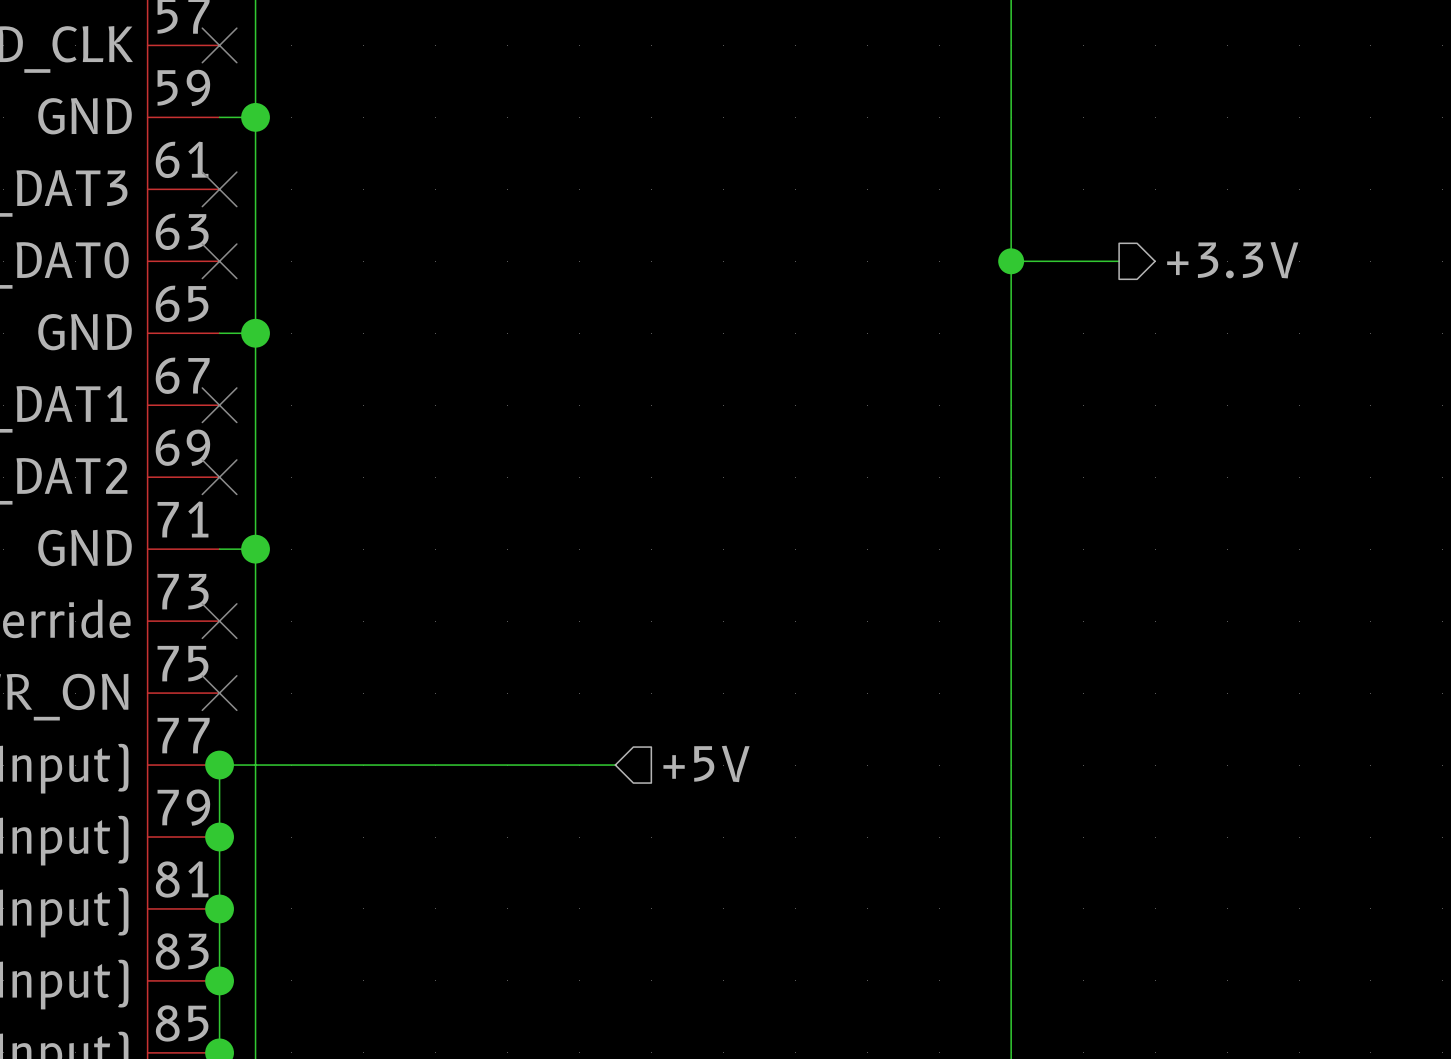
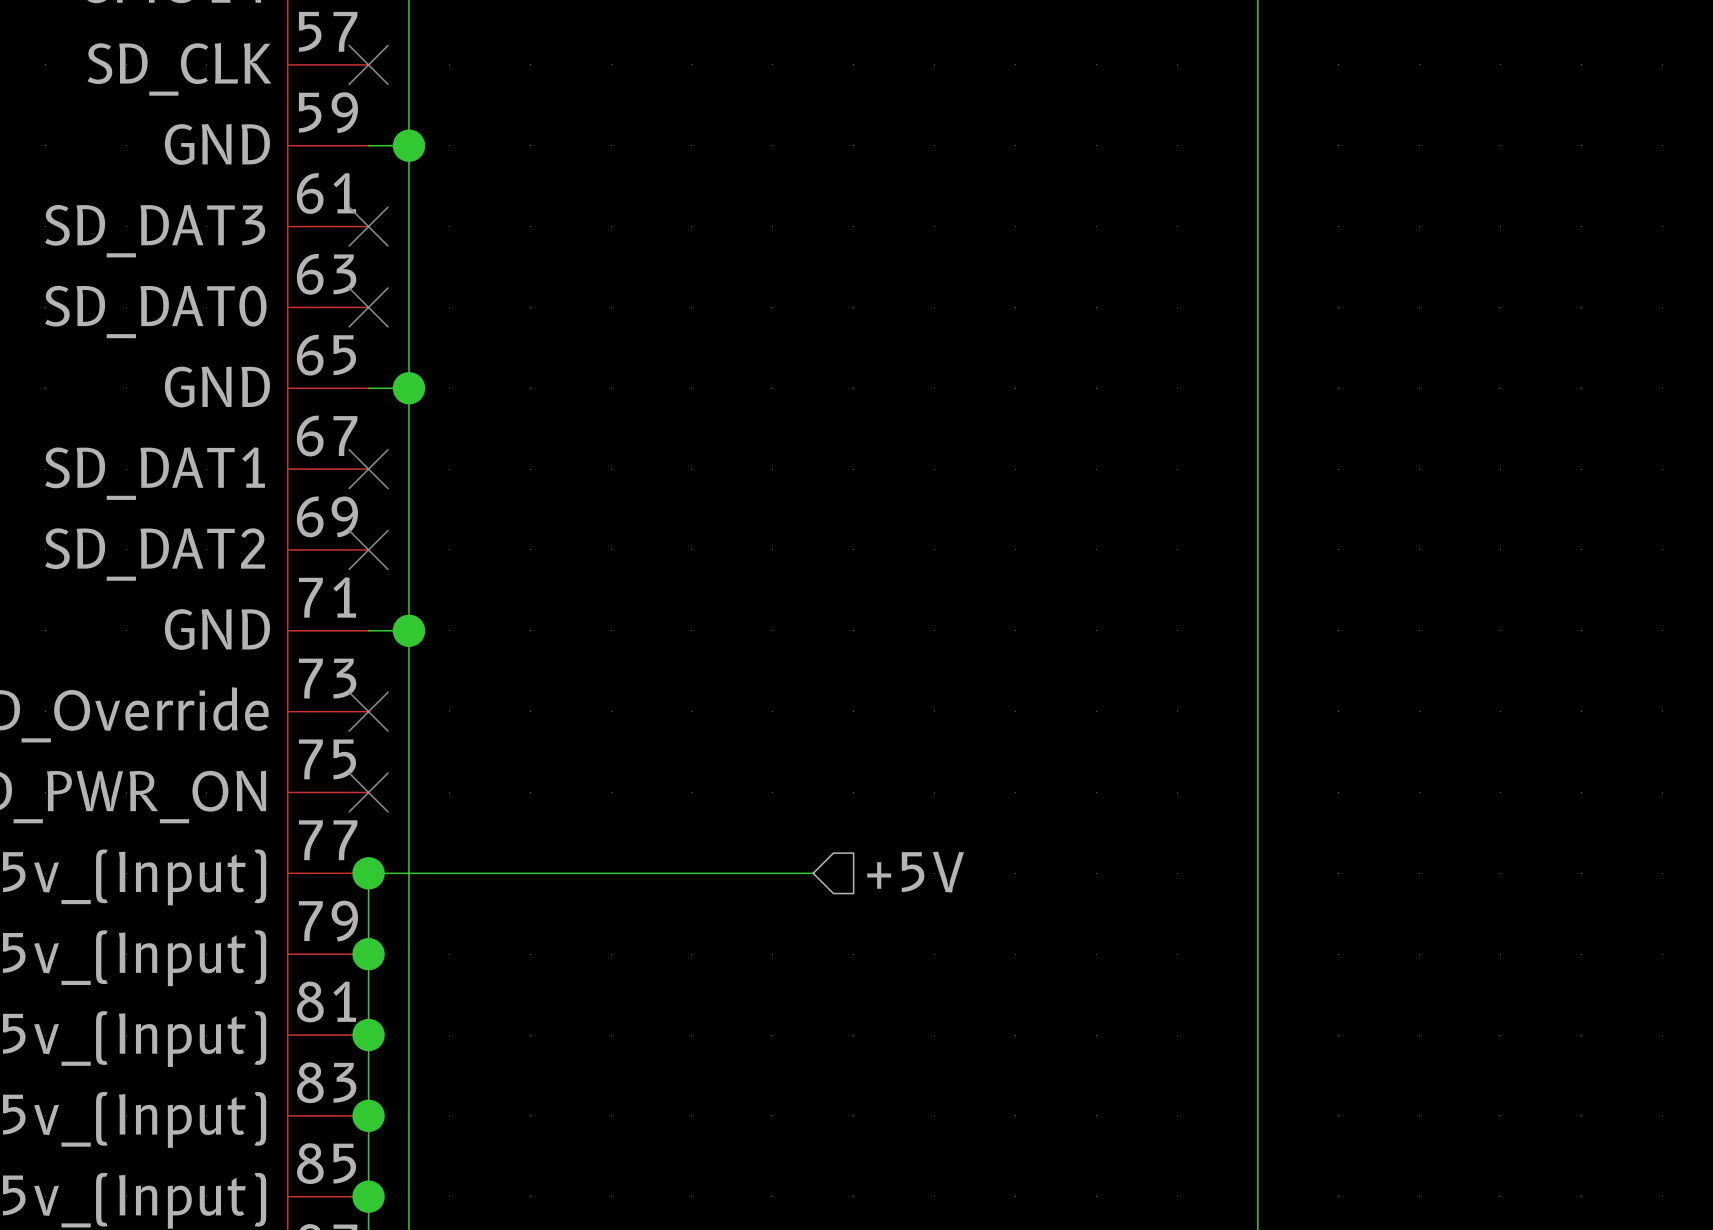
hierarchical label: +3.3V (1232, 260) -> none
wire: (1011, 261) (1119, 261) -> none
junction: (1011, 261) -> none

